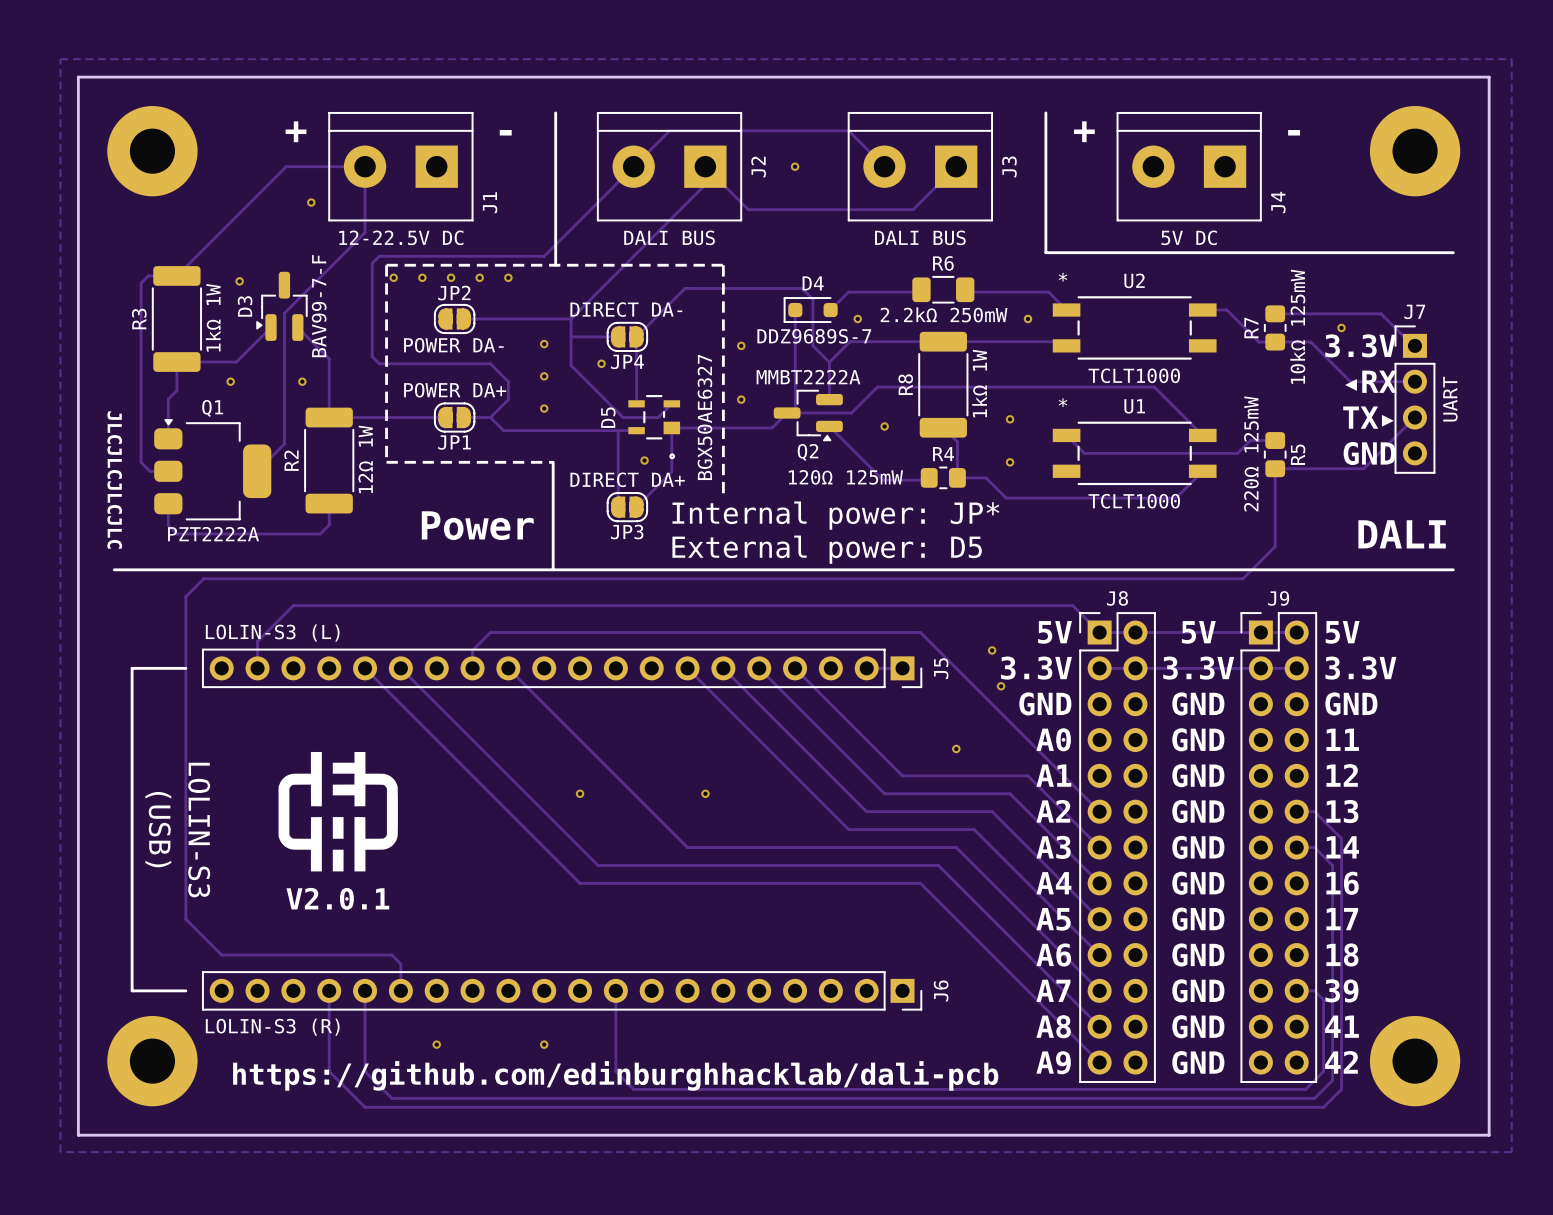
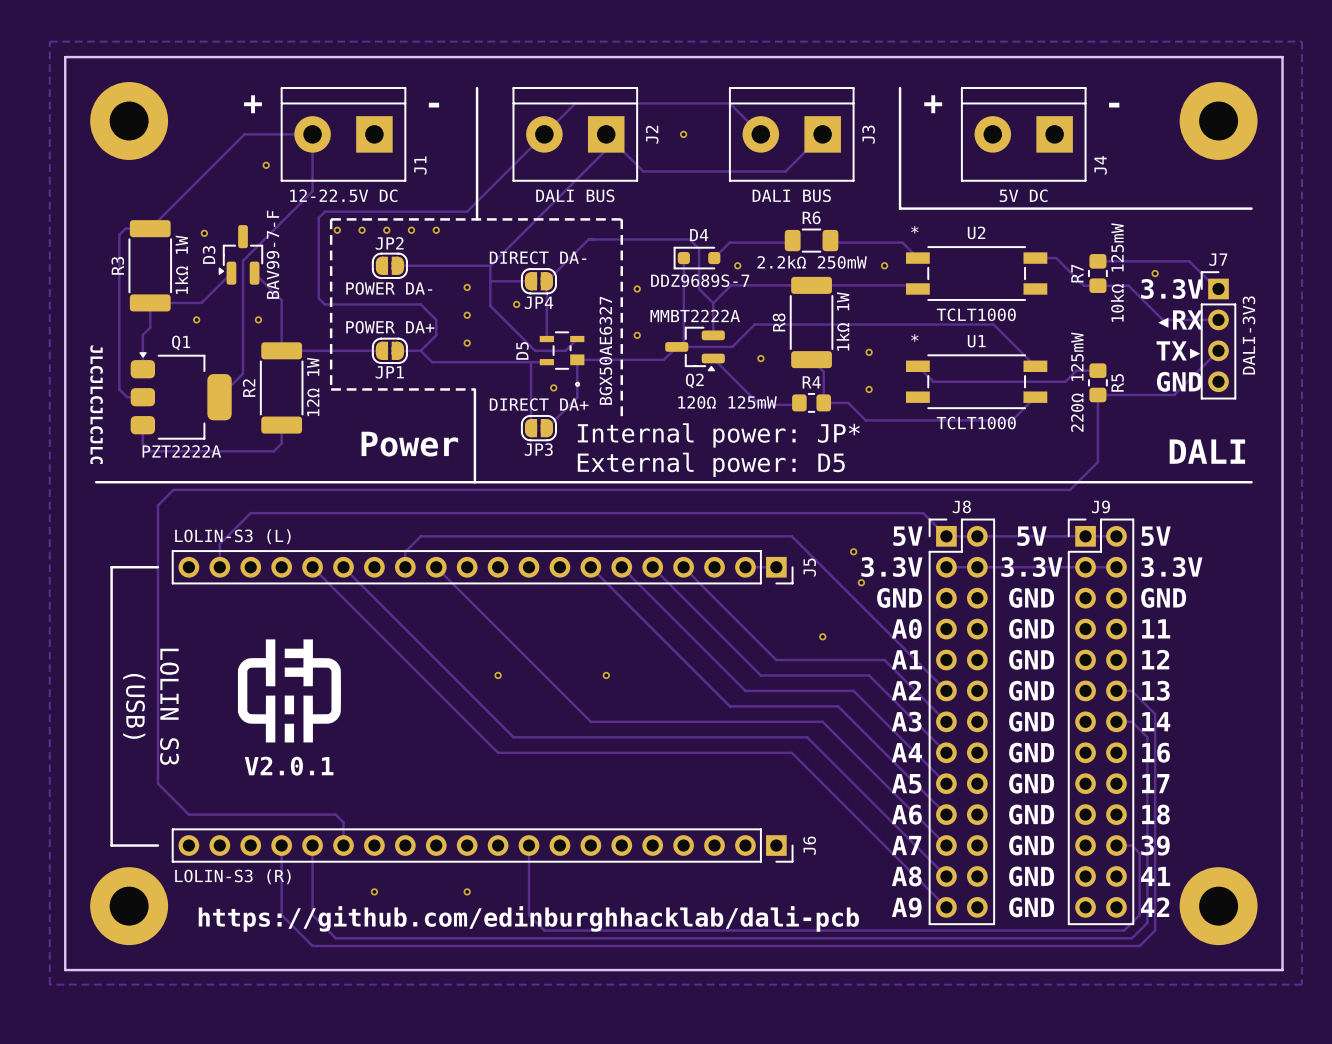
J7 value: UART (1450, 399) -> DALI-3V3 (1248, 335)
text: LOLIN-S3 (199, 830) -> LOLIN S3 (169, 706)

